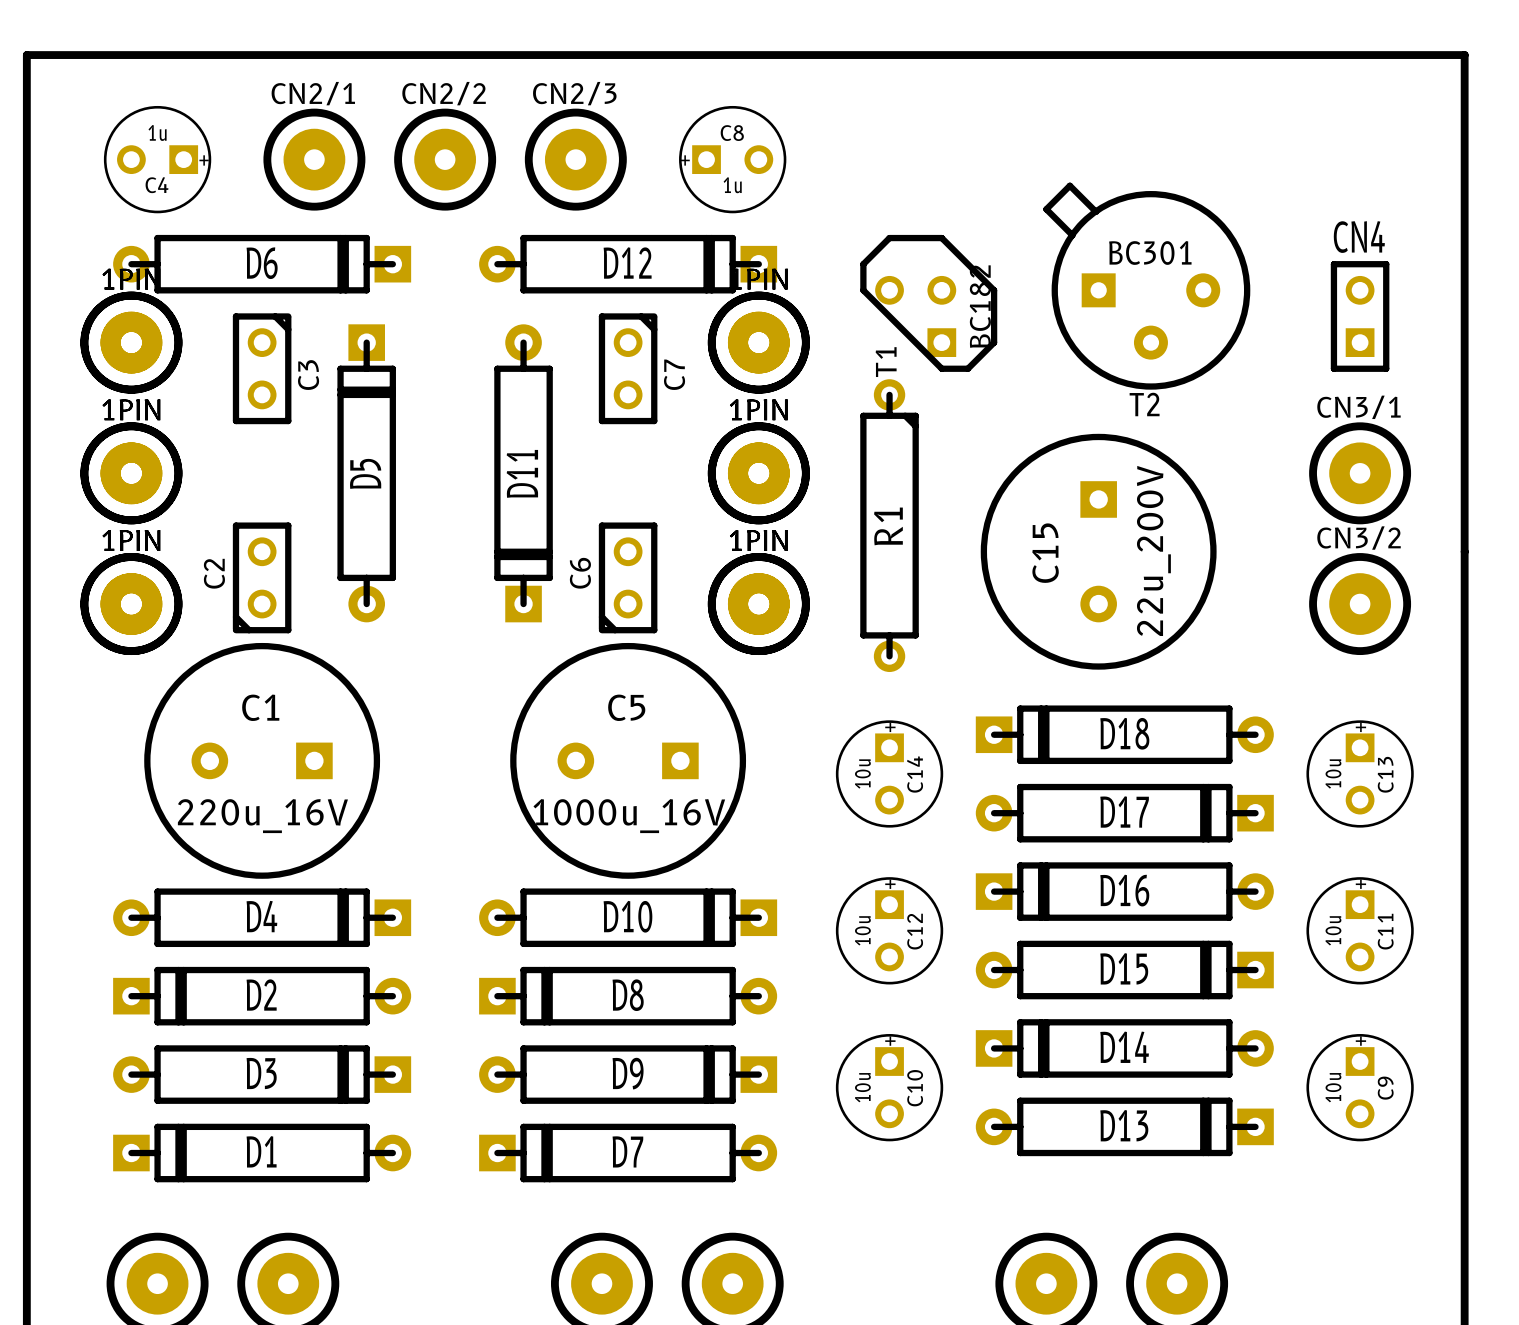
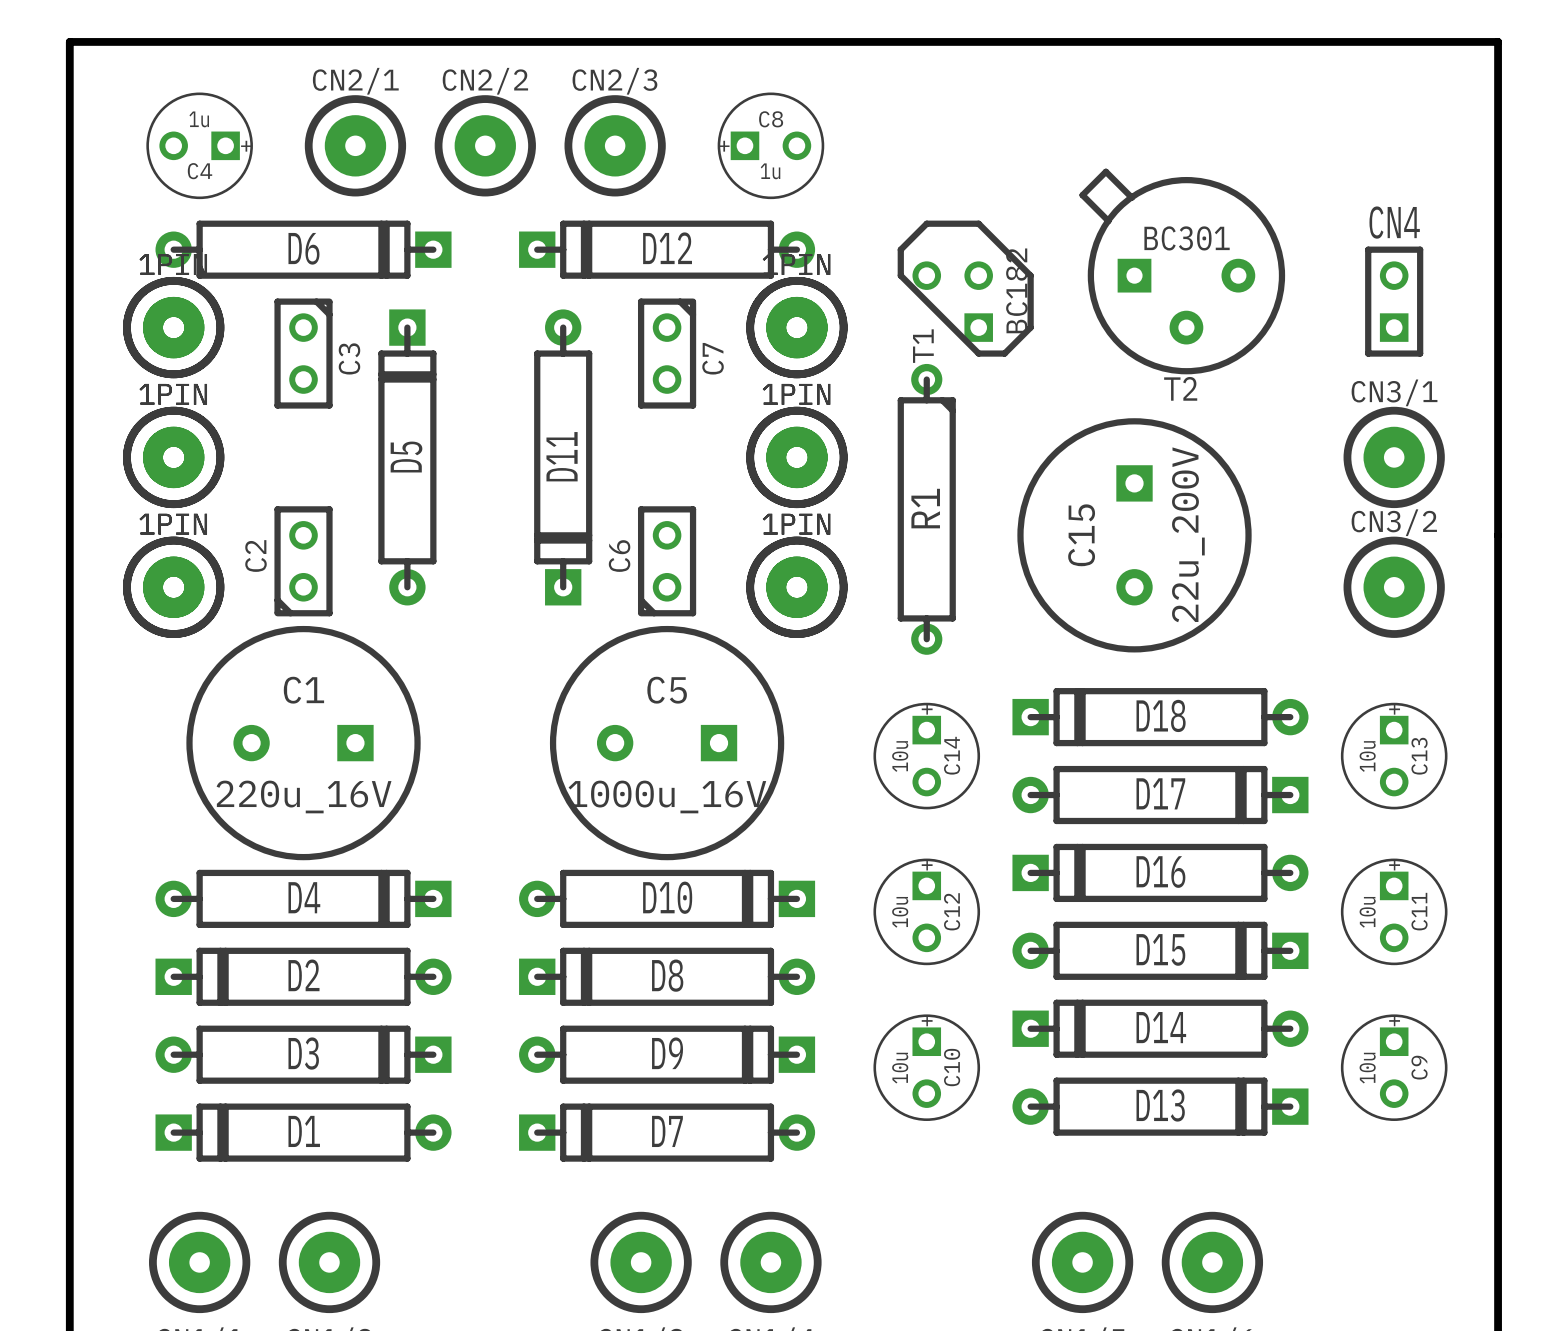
D12 rotation: 0° (628, 264) -> 180° (667, 249)

